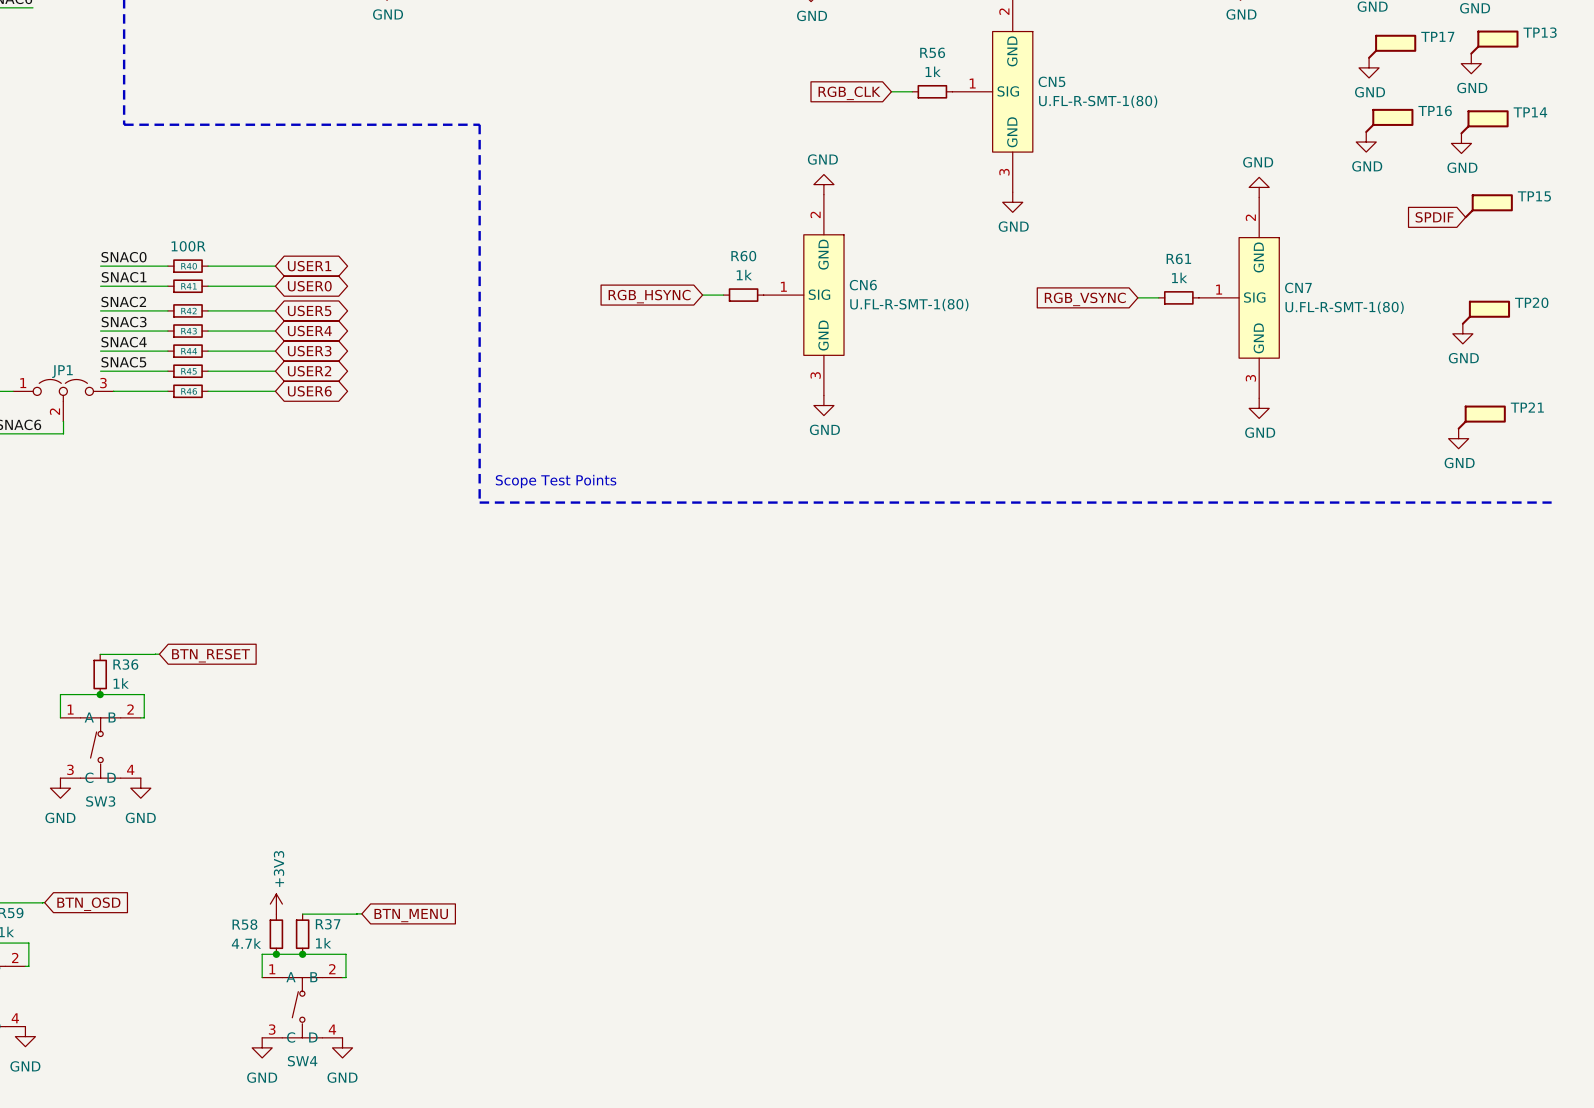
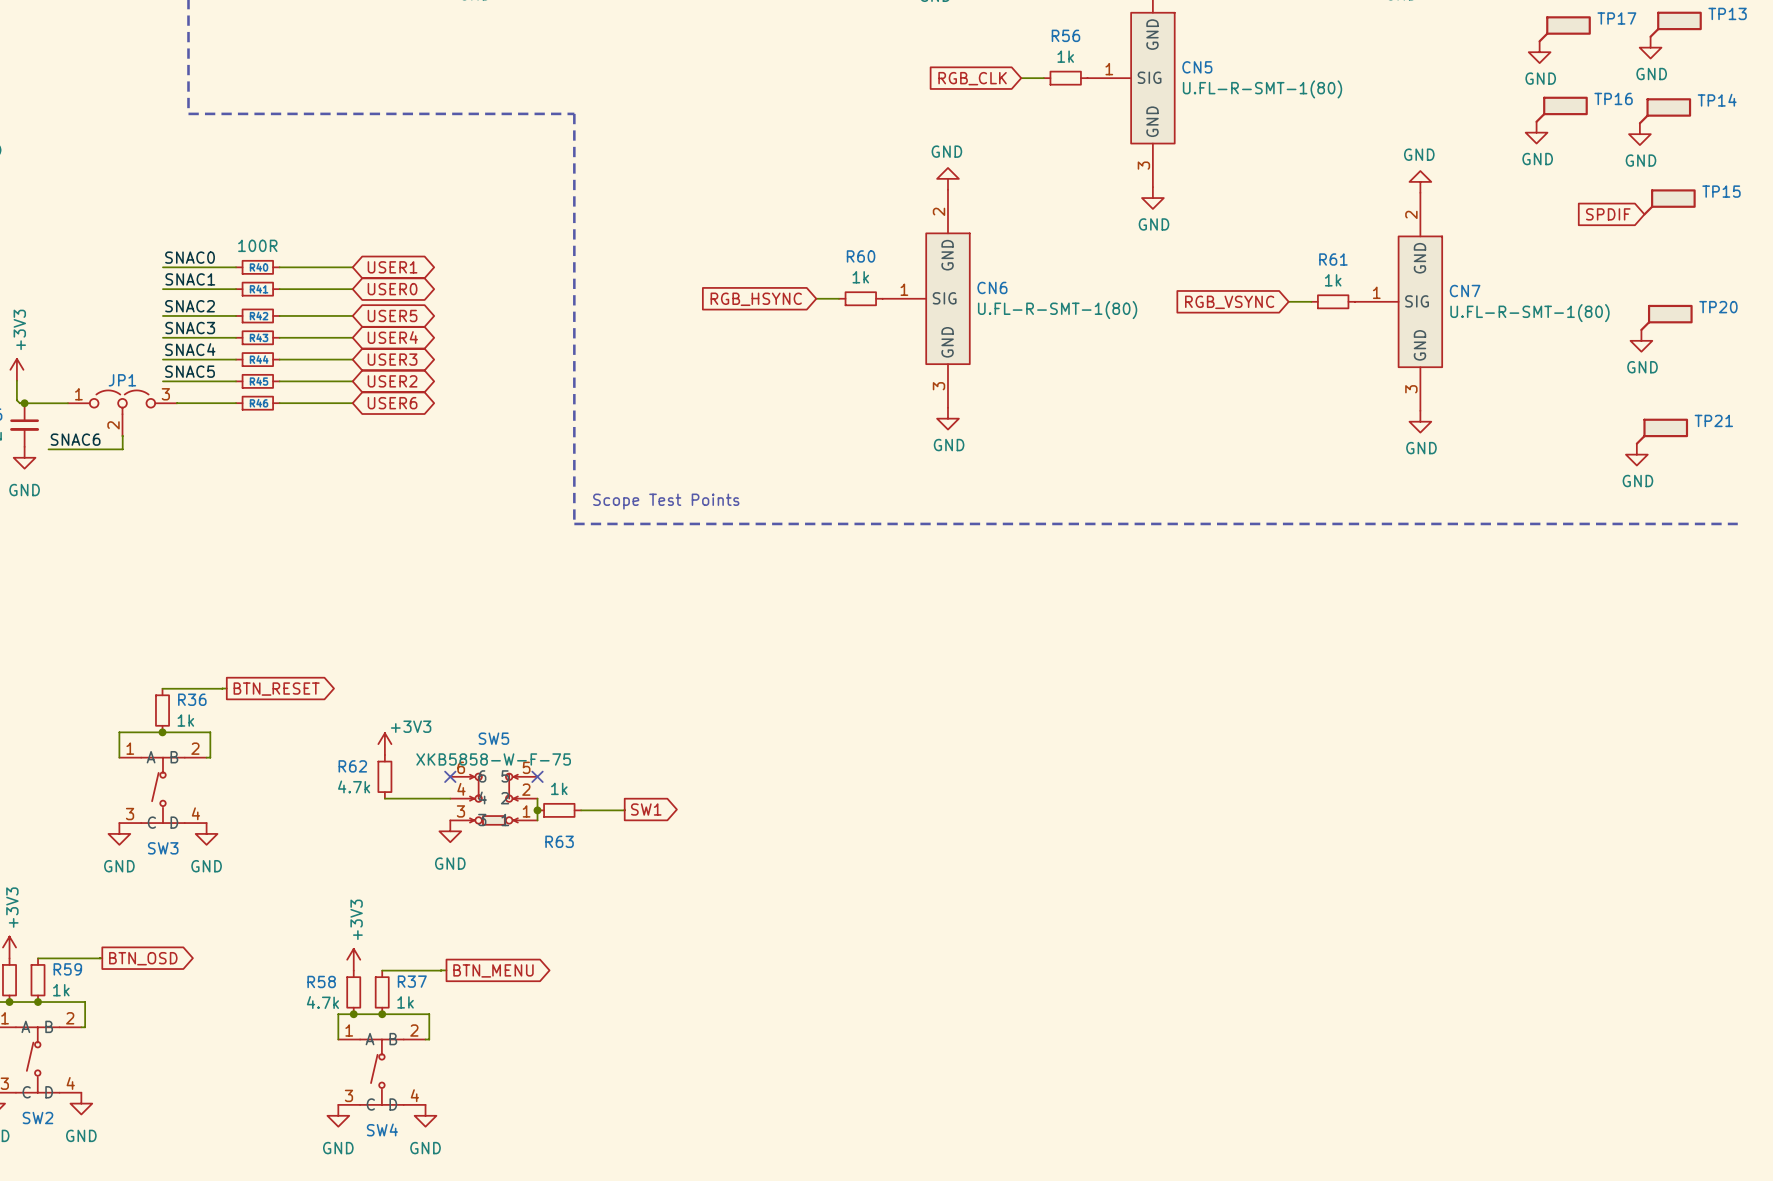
global label shape: input (211, 655) -> output (276, 689)
power symbol: none -> +3V3 (384, 744)
R62: none -> 4.7k (384, 776)
no-connect mark: none -> (450, 776)
no-connect mark: none -> (537, 776)
wire: none -> (384, 798) (450, 798)
wire: none -> (537, 798) (537, 820)
SW5: none -> XKB5858-W-F-75 (493, 799)
wire: none -> (624, 809) (581, 810)
global label: none -> SW1 (646, 809)
junction: none -> (537, 810)
R63: none -> 1k (559, 810)
power symbol: none -> GND (450, 831)
global label shape: input (88, 904) -> output (143, 958)
global label shape: input (411, 915) -> output (493, 970)

